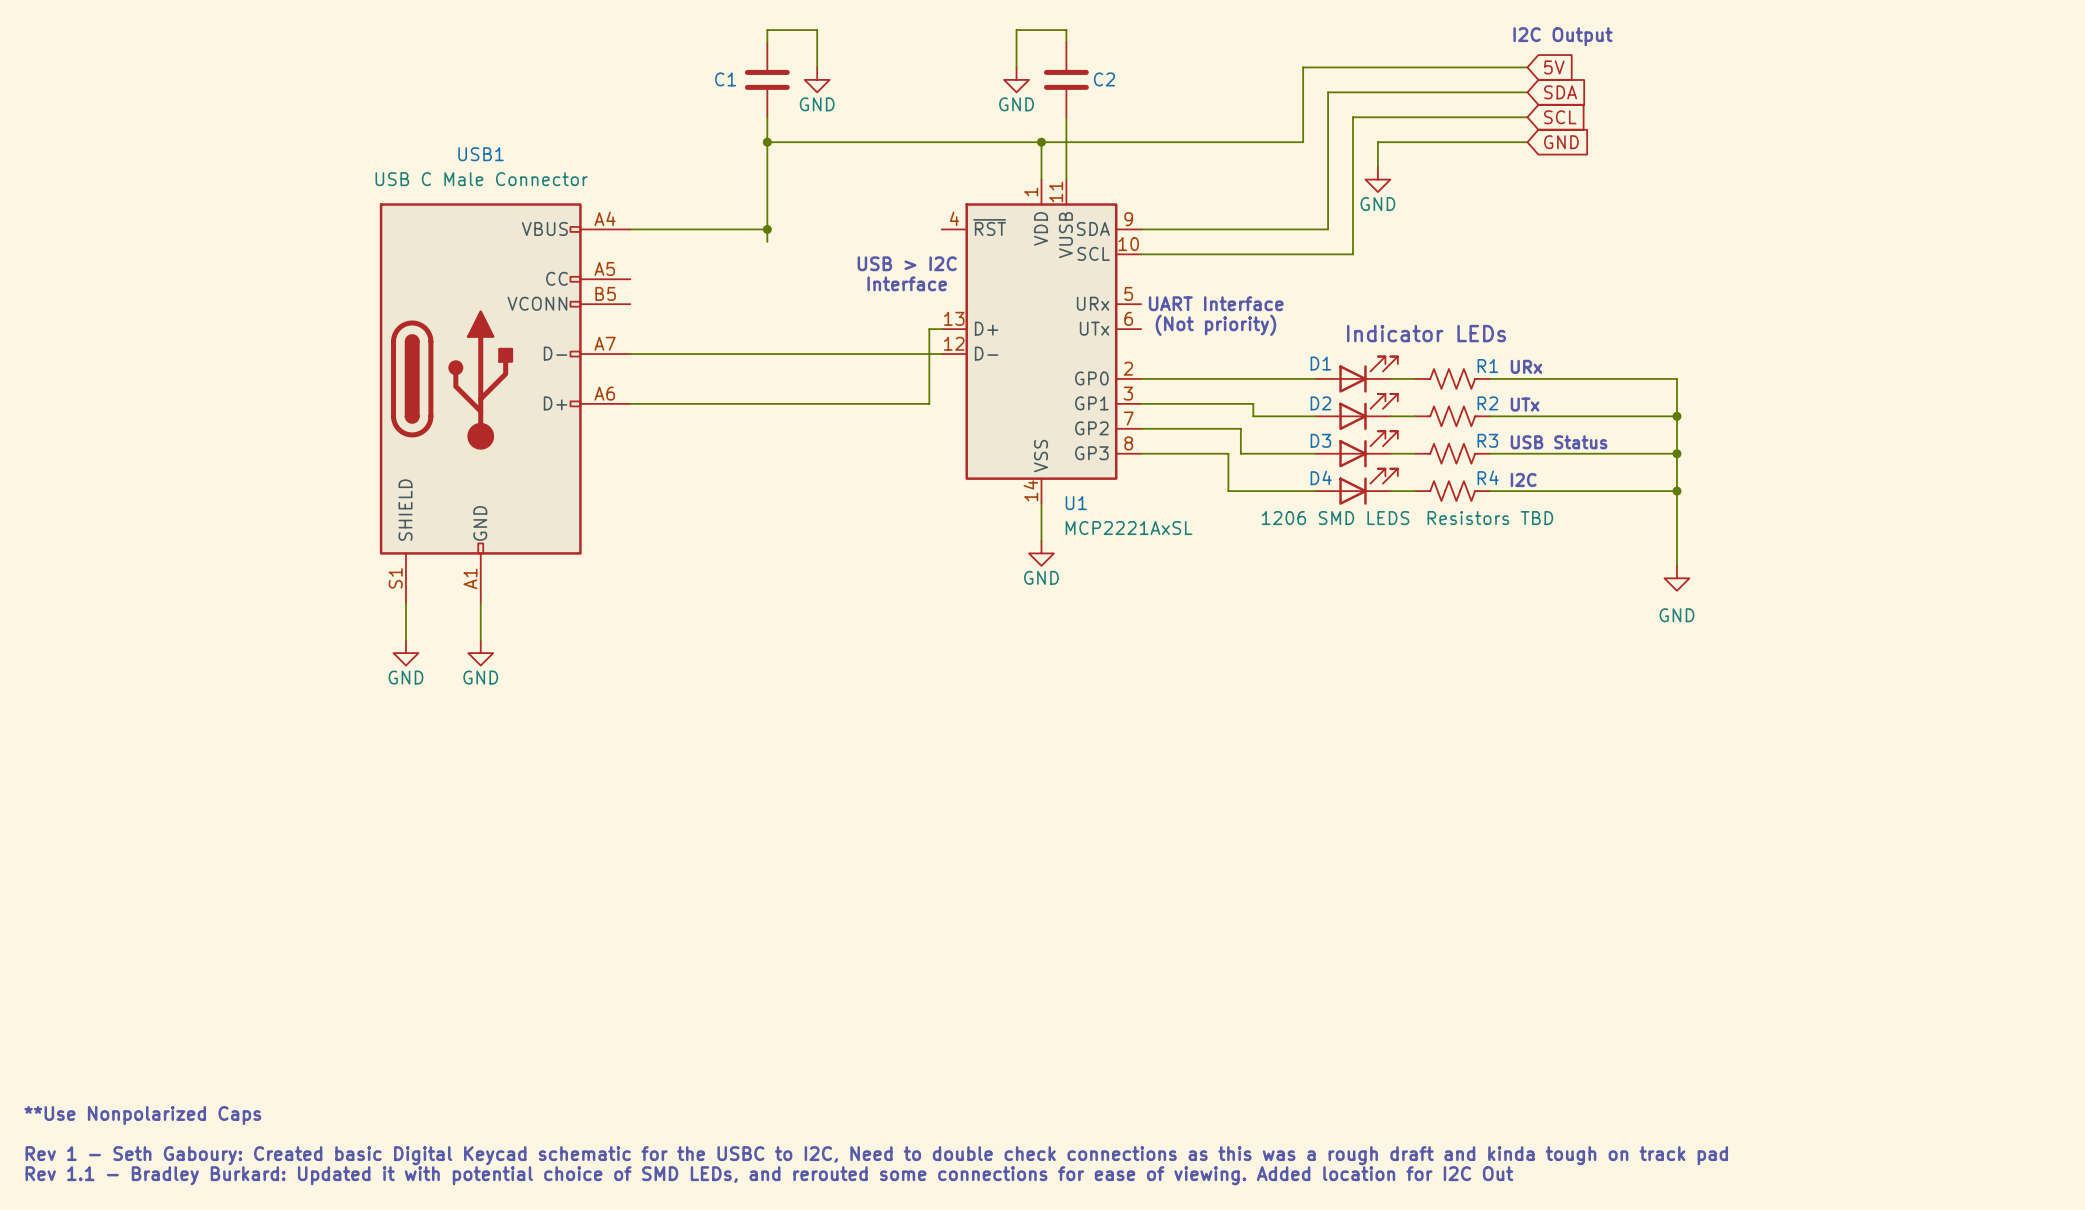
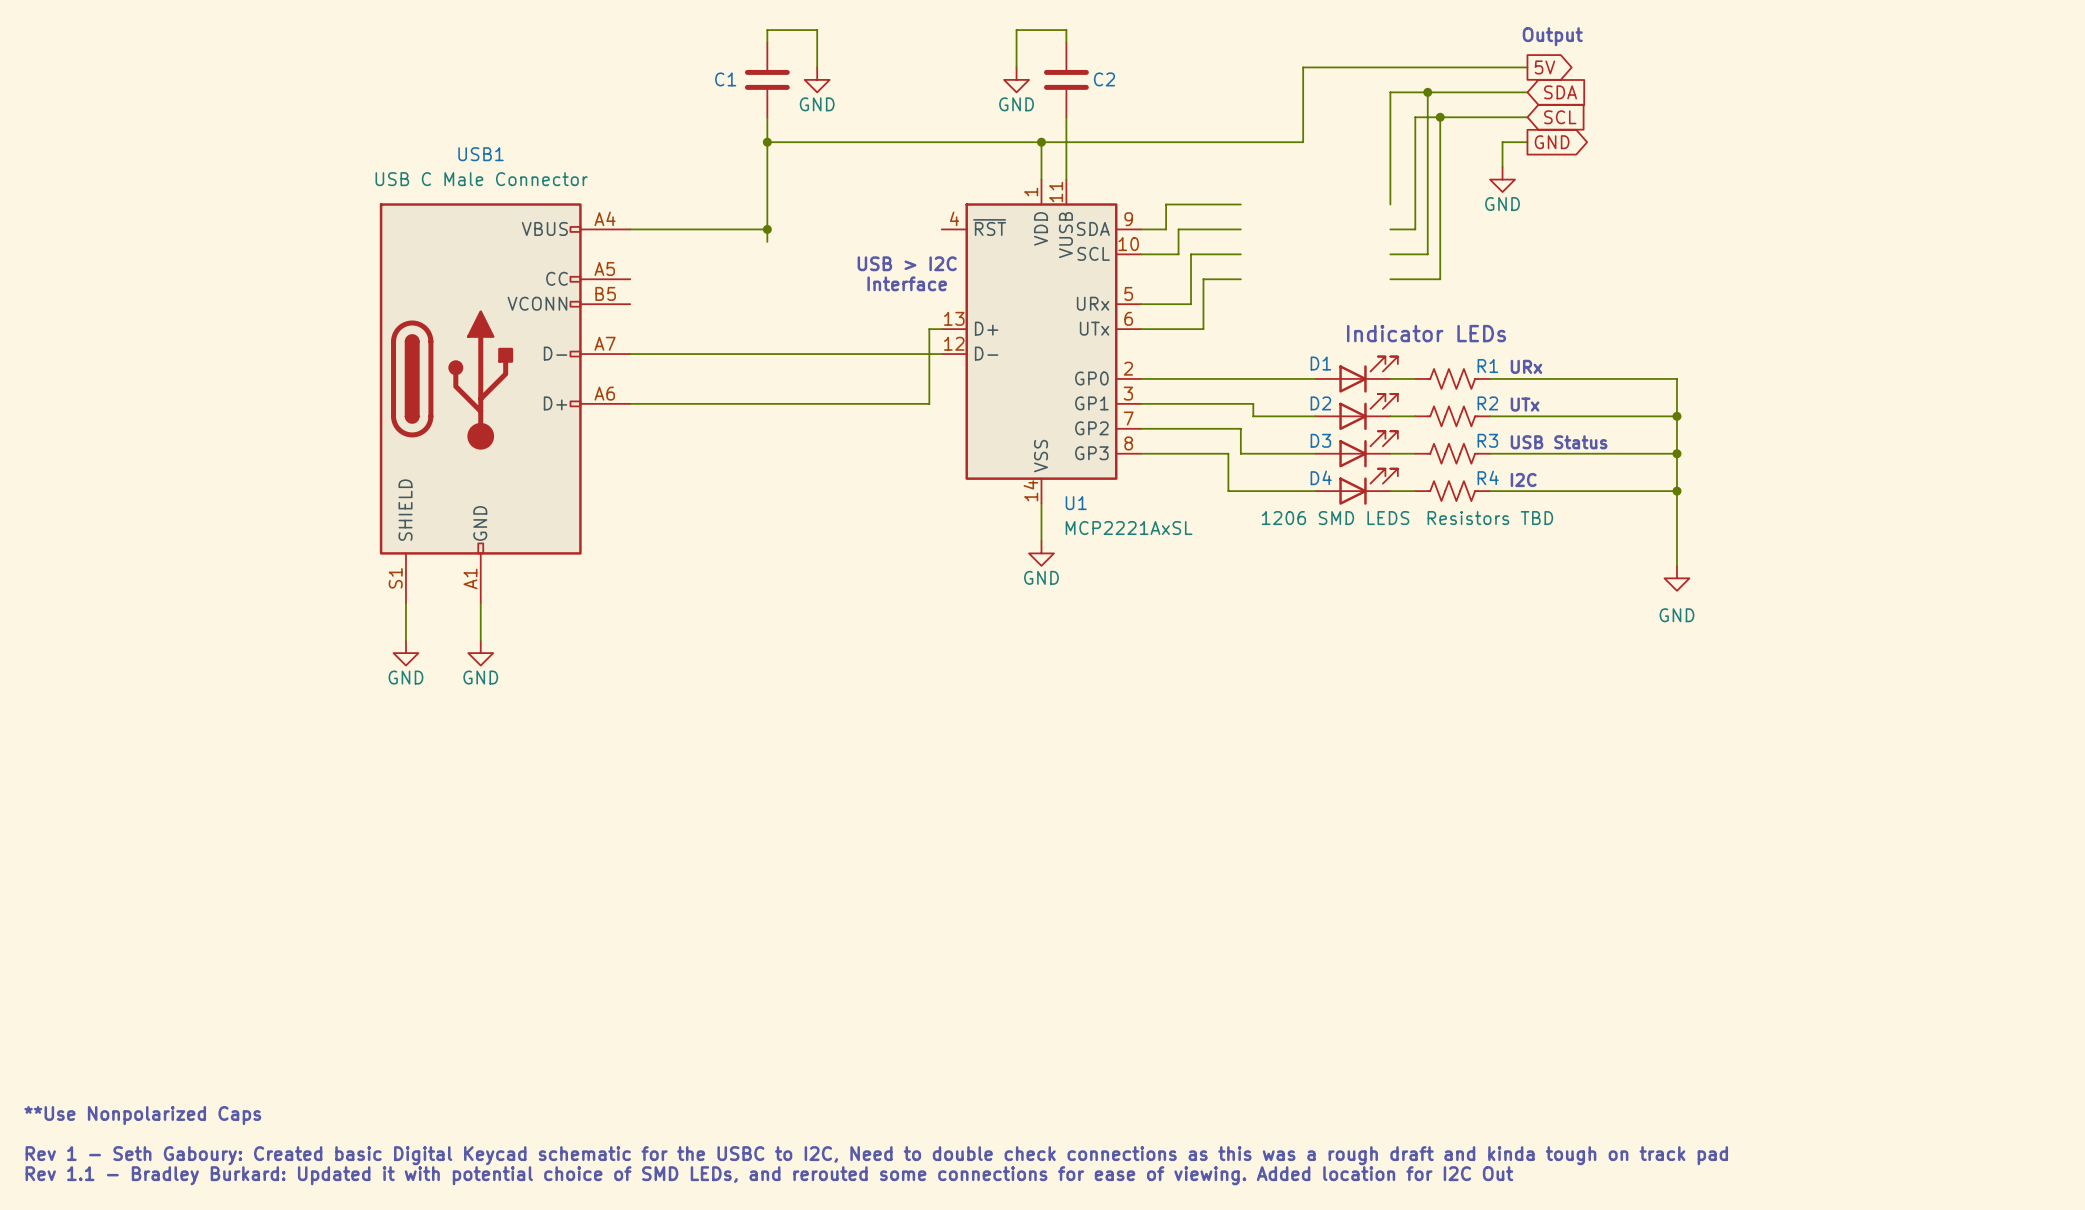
text: I2C Output (1562, 36) -> Output (1552, 36)
global label shape: input (1554, 67) -> output (1544, 67)
wire: (1390, 92) (1328, 92) (1328, 229) (1240, 229) -> (1390, 92) (1390, 204)
wire: none -> (1427, 92) (1427, 254) (1390, 254)
junction: none -> (1427, 92)
wire: (1415, 117) (1353, 117) (1353, 254) (1240, 254) -> (1415, 117) (1415, 229) (1390, 229)
wire: none -> (1440, 117) (1440, 279) (1390, 279)
junction: none -> (1440, 117)
wire: (1502, 142) (1377, 142) (1377, 167) -> (1502, 142) (1502, 167)
global label shape: input (1561, 142) -> output (1552, 142)
power symbol position: GND (1377, 179) -> GND (1502, 179)
wire: none -> (1240, 204) (1166, 204) (1166, 229)
wire: (1166, 229) (1178, 229) -> (1178, 254) (1178, 229)
wire: (1178, 254) (1191, 254) -> (1141, 304) (1191, 304) (1191, 254)
wire: none -> (1240, 279) (1203, 279) (1203, 329) (1141, 329)
text: UART Interface (1216, 303) -> none
text: (Not priority) (1215, 325) -> none

